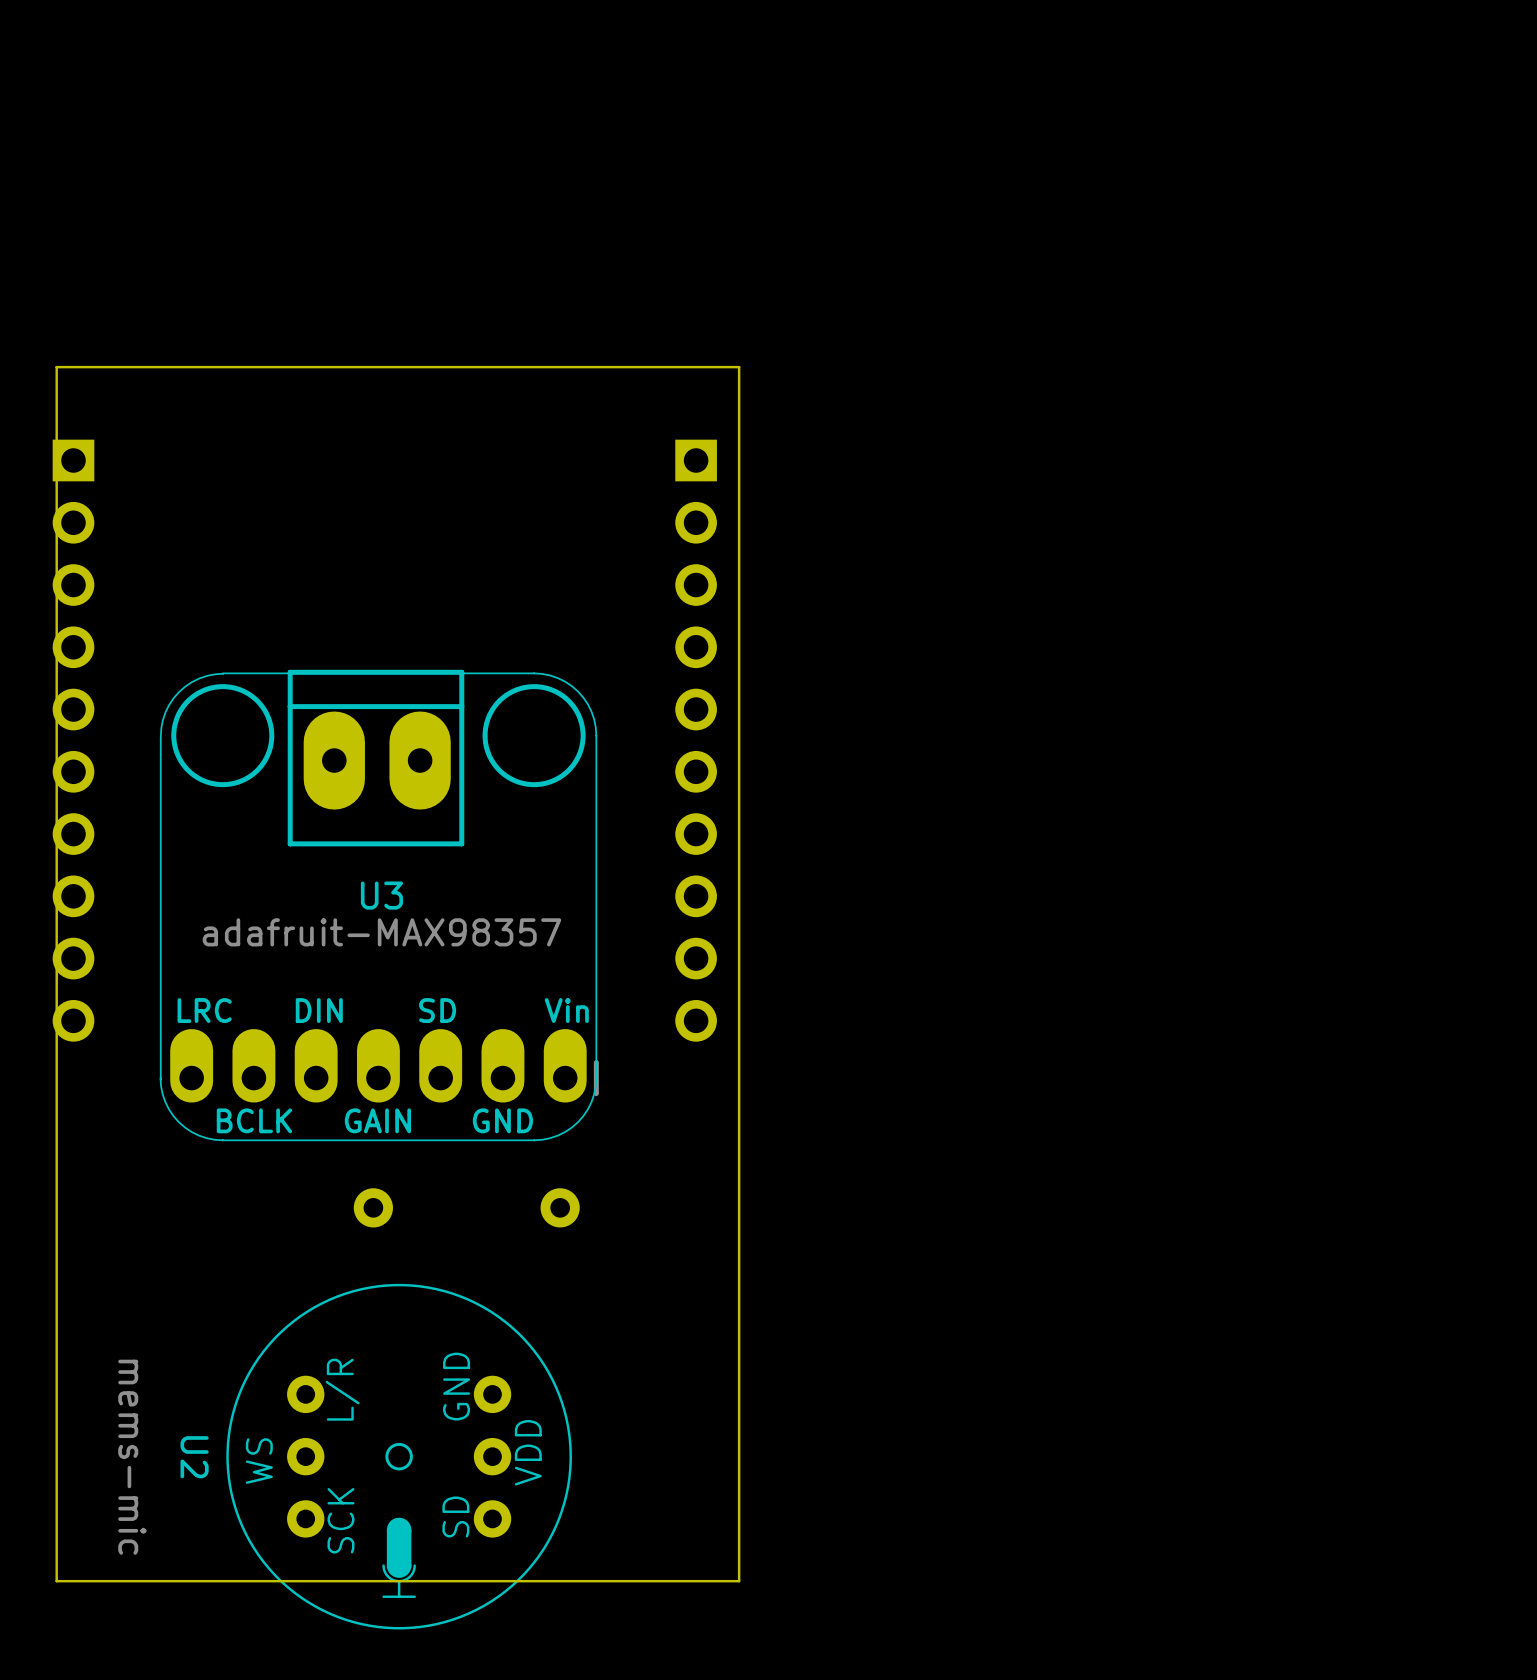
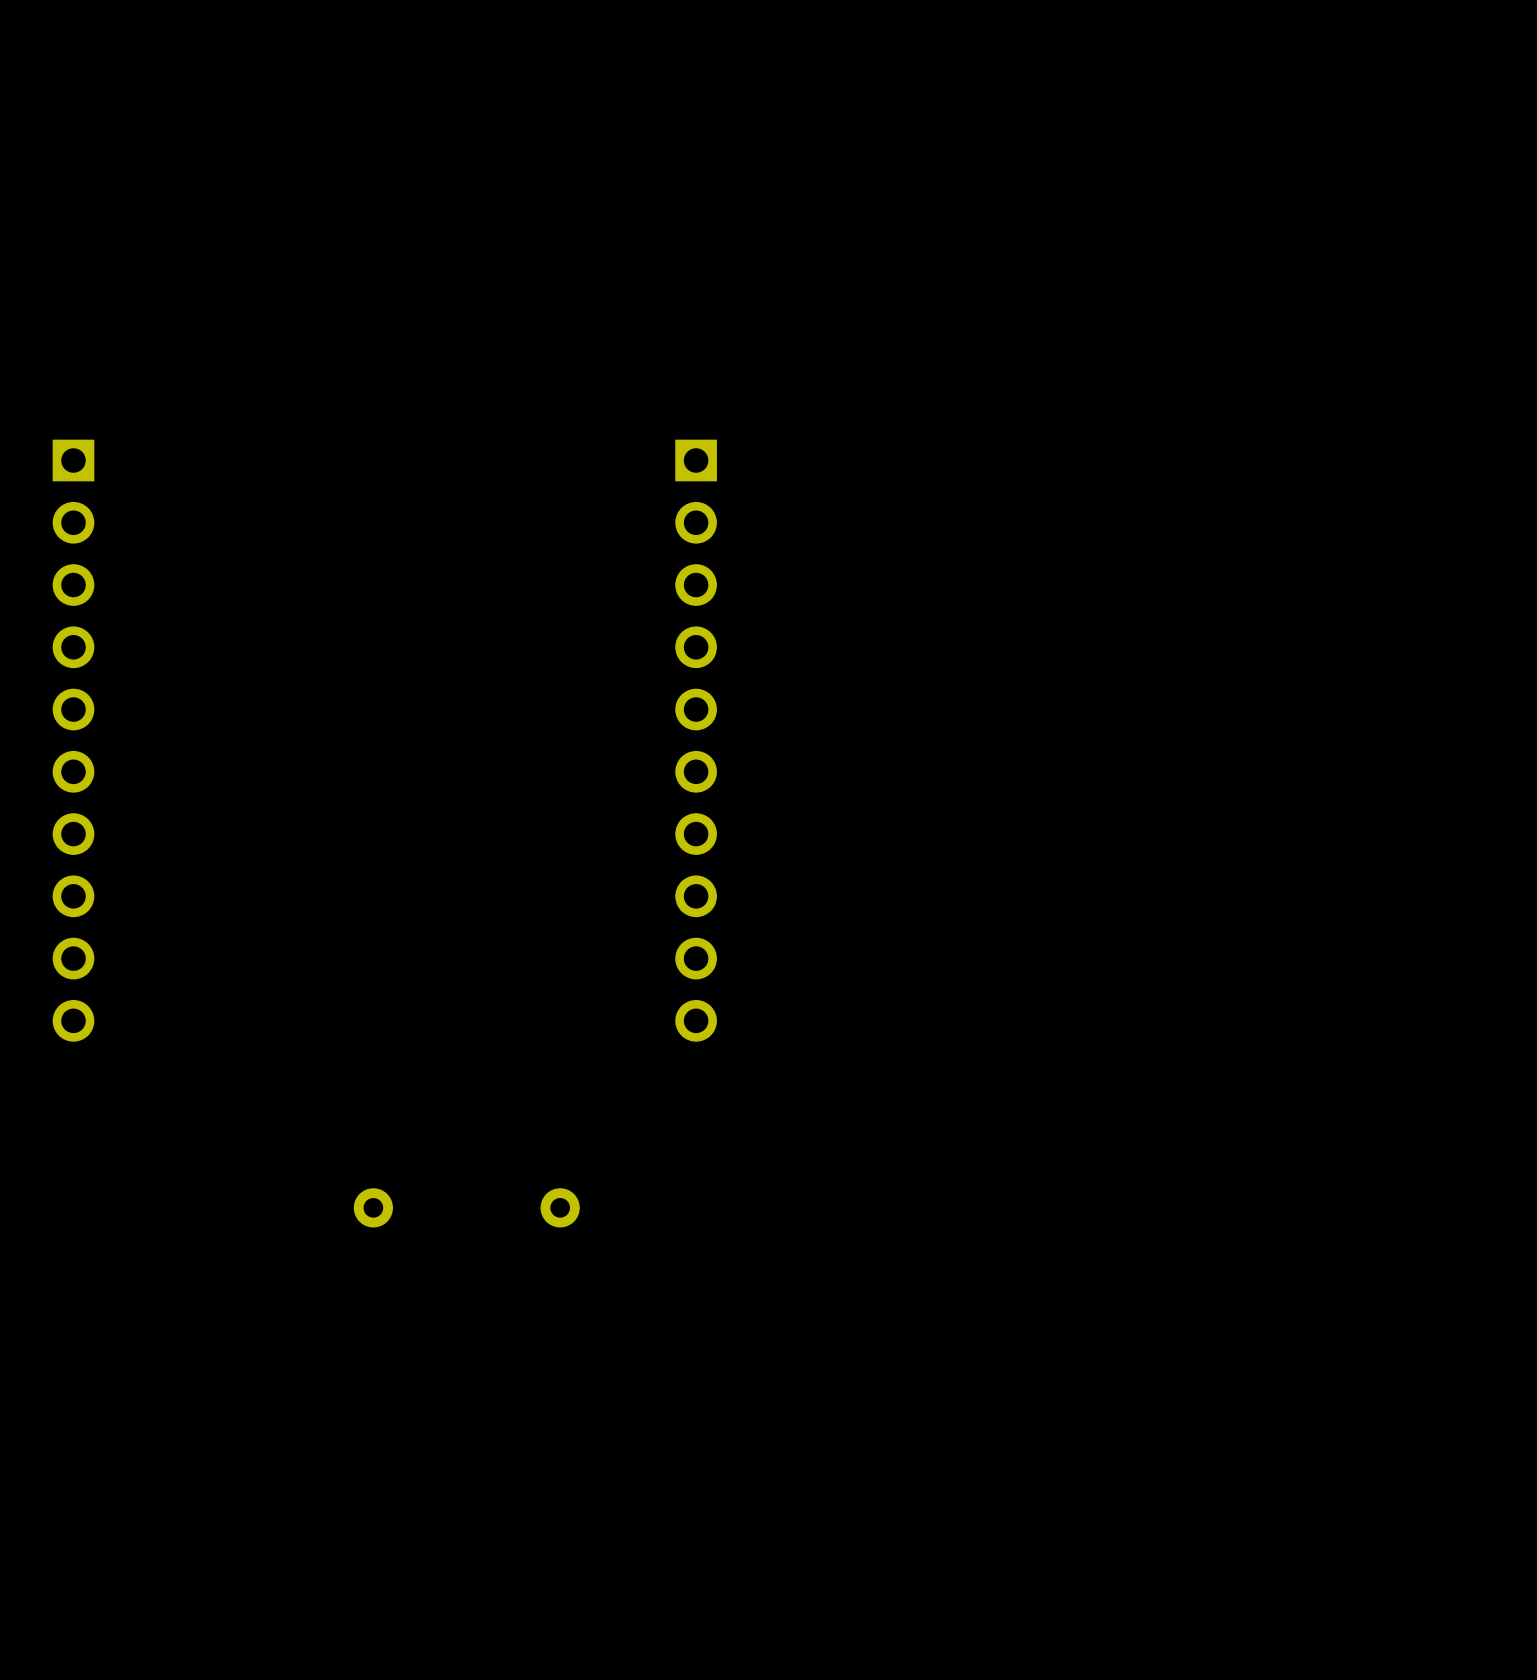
board edge: (739, 367) (56, 367) (56, 1581) (739, 1581) (739, 367) -> none
U3: adafruit-MAX98357 (379, 905) -> none
U2: mems-mic (399, 1456) -> none

